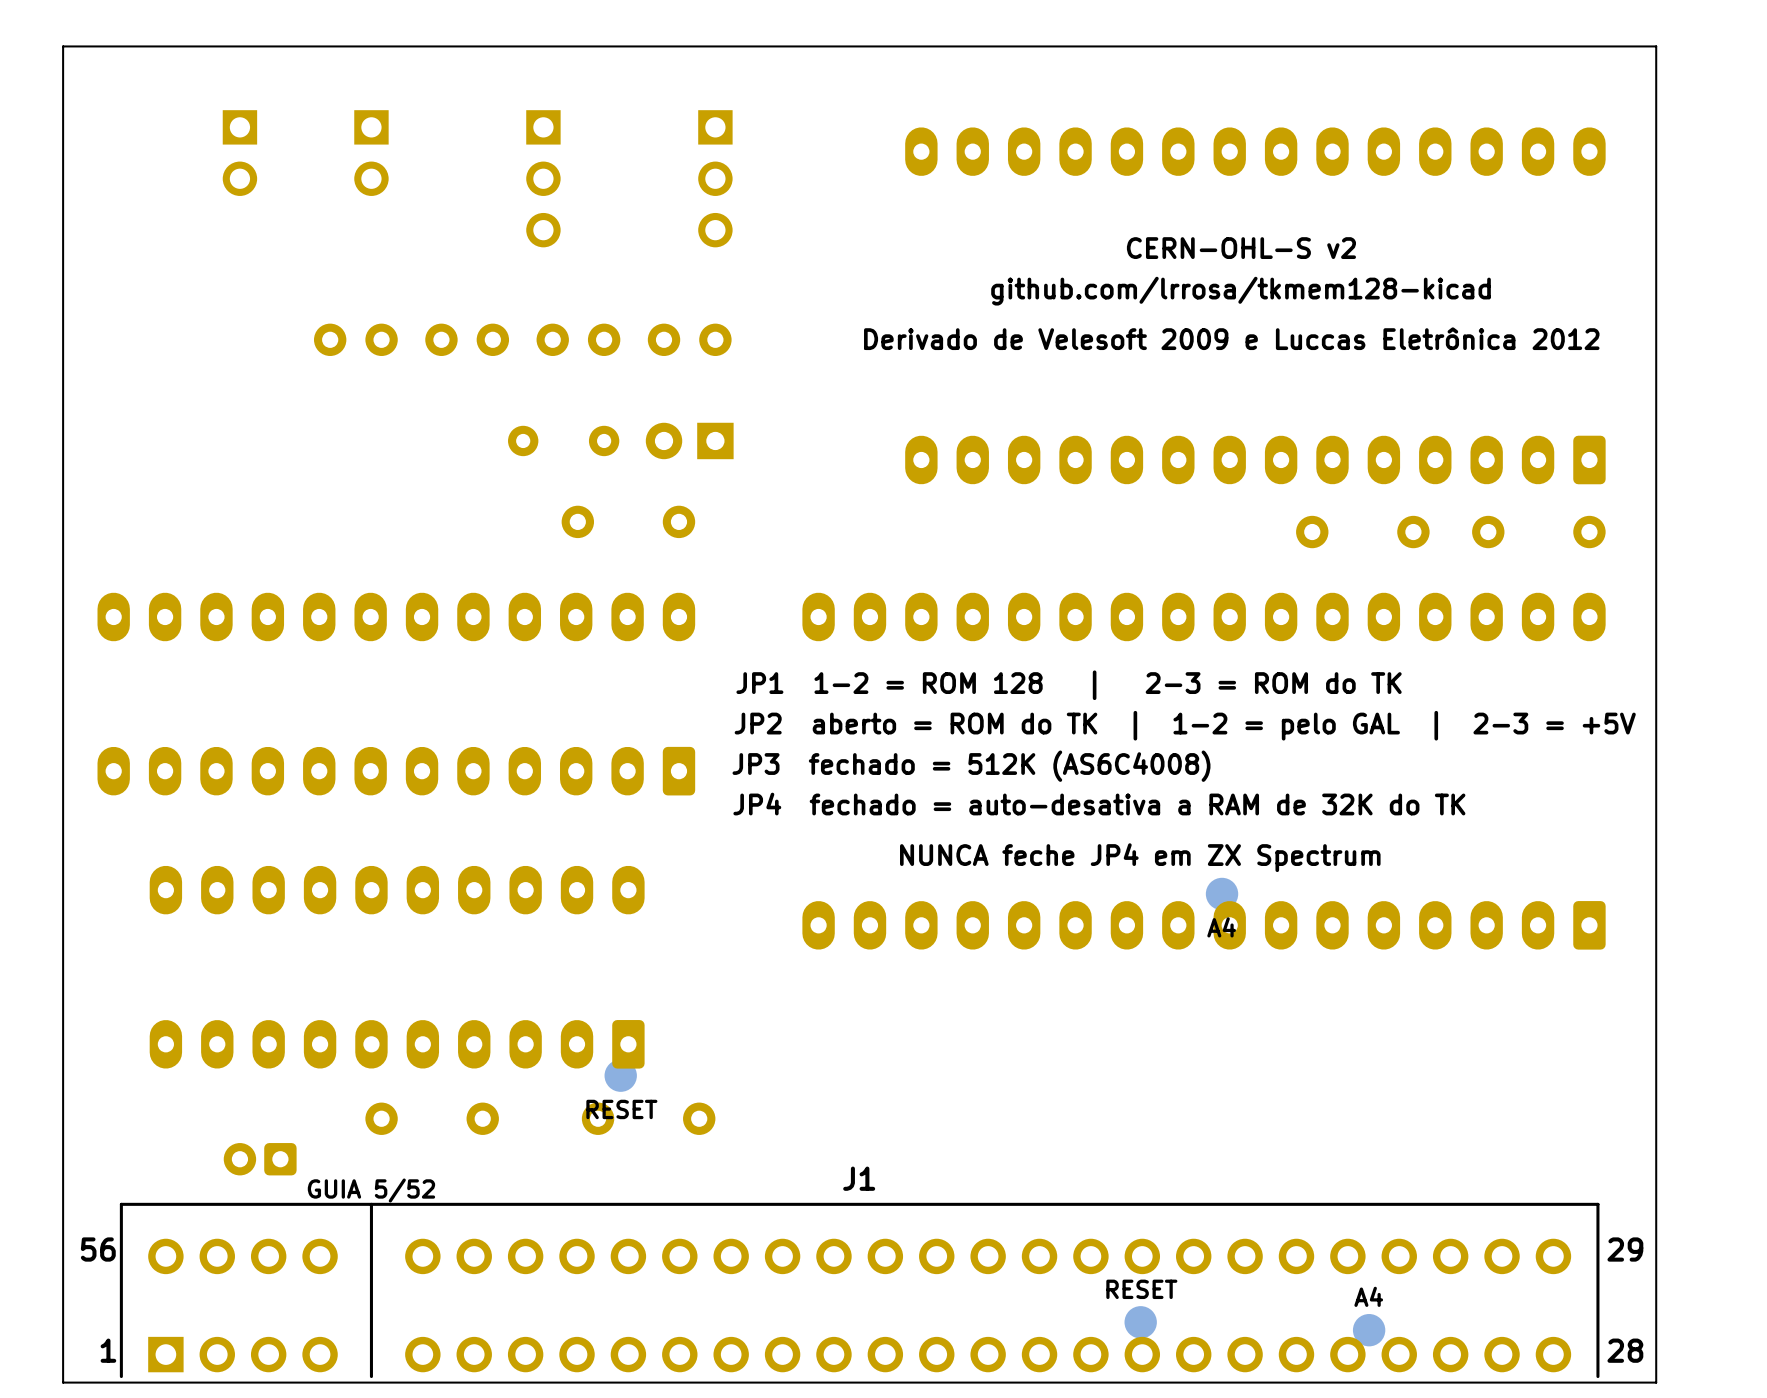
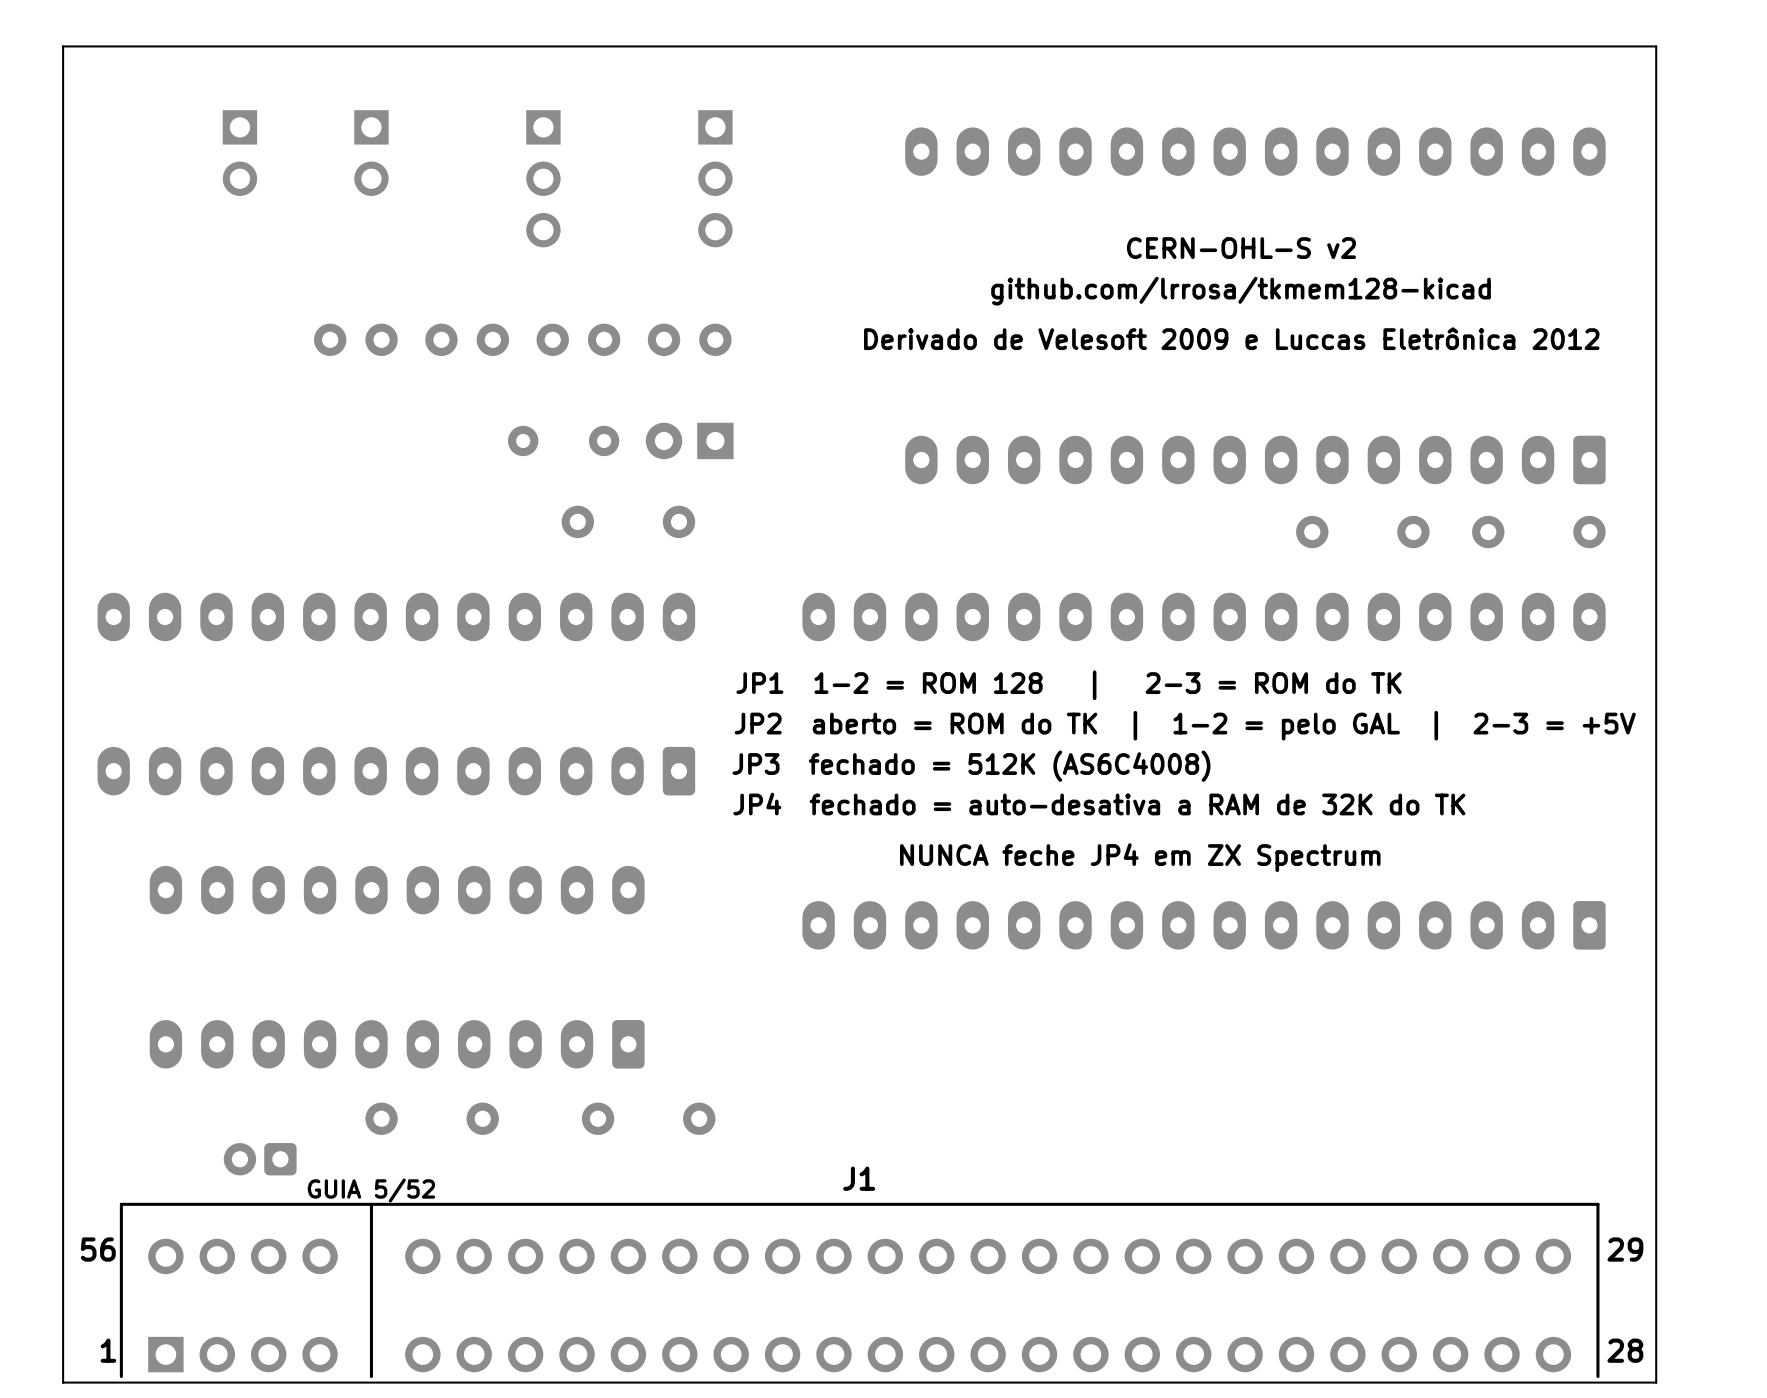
part: (1222, 893) -> none
text: A4 (1221, 927) -> none
part: (620, 1075) -> none
text: RESET (621, 1109) -> none
text: RESET (1141, 1289) -> none
text: A4 (1368, 1296) -> none
part: (1140, 1322) -> none
part: (1369, 1330) -> none

